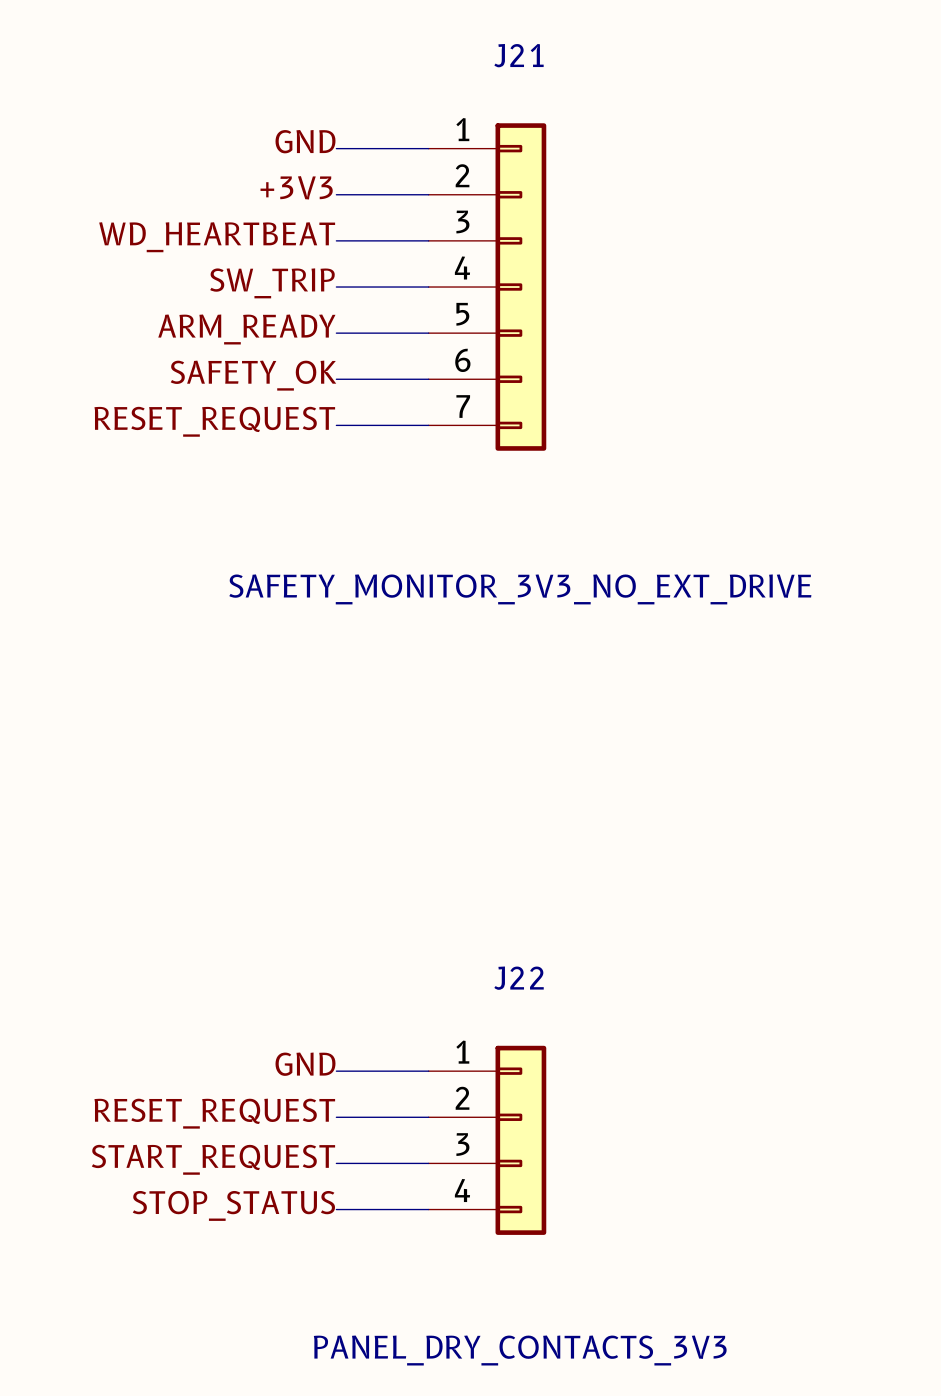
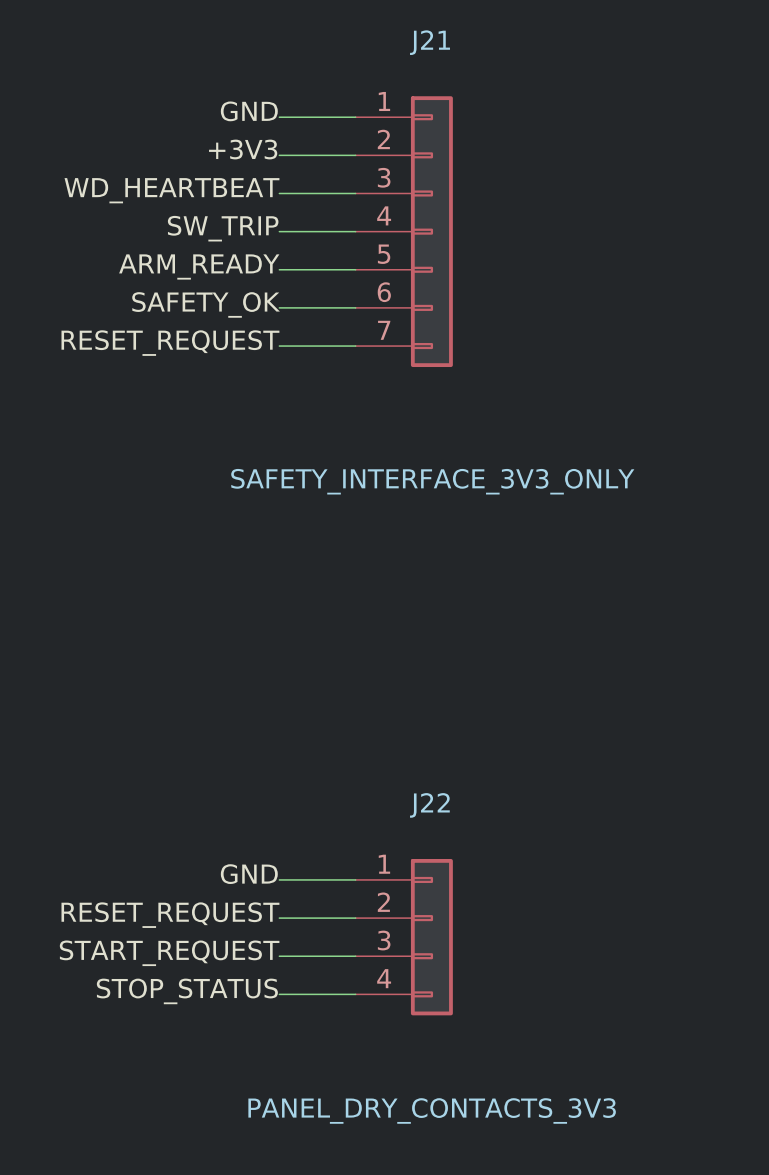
J21 value: SAFETY_MONITOR_3V3_NO_EXT_DRIVE (520, 589) -> SAFETY_INTERFACE_3V3_ONLY (432, 481)

